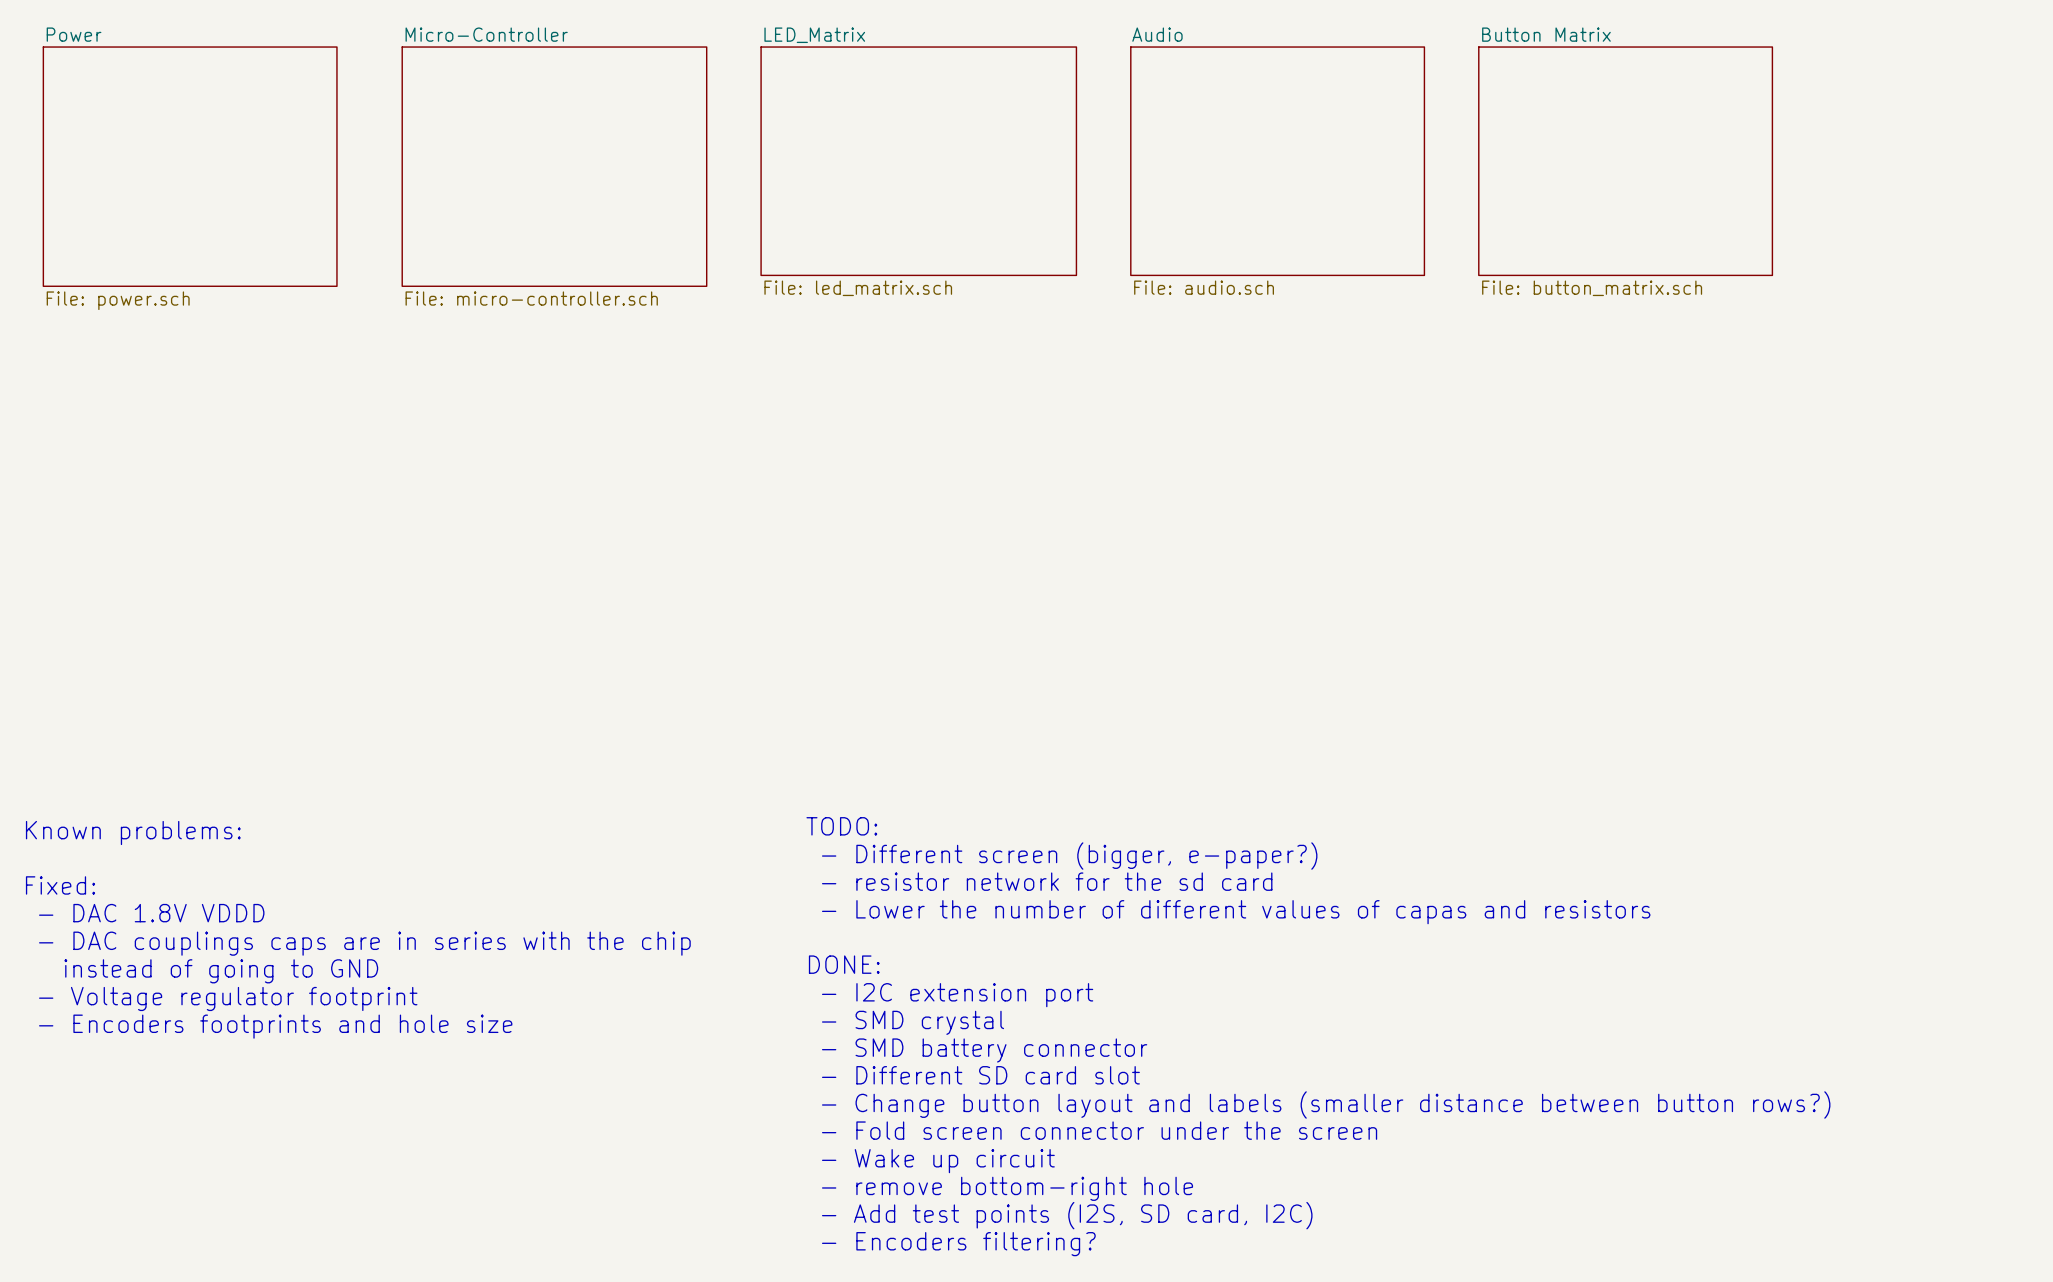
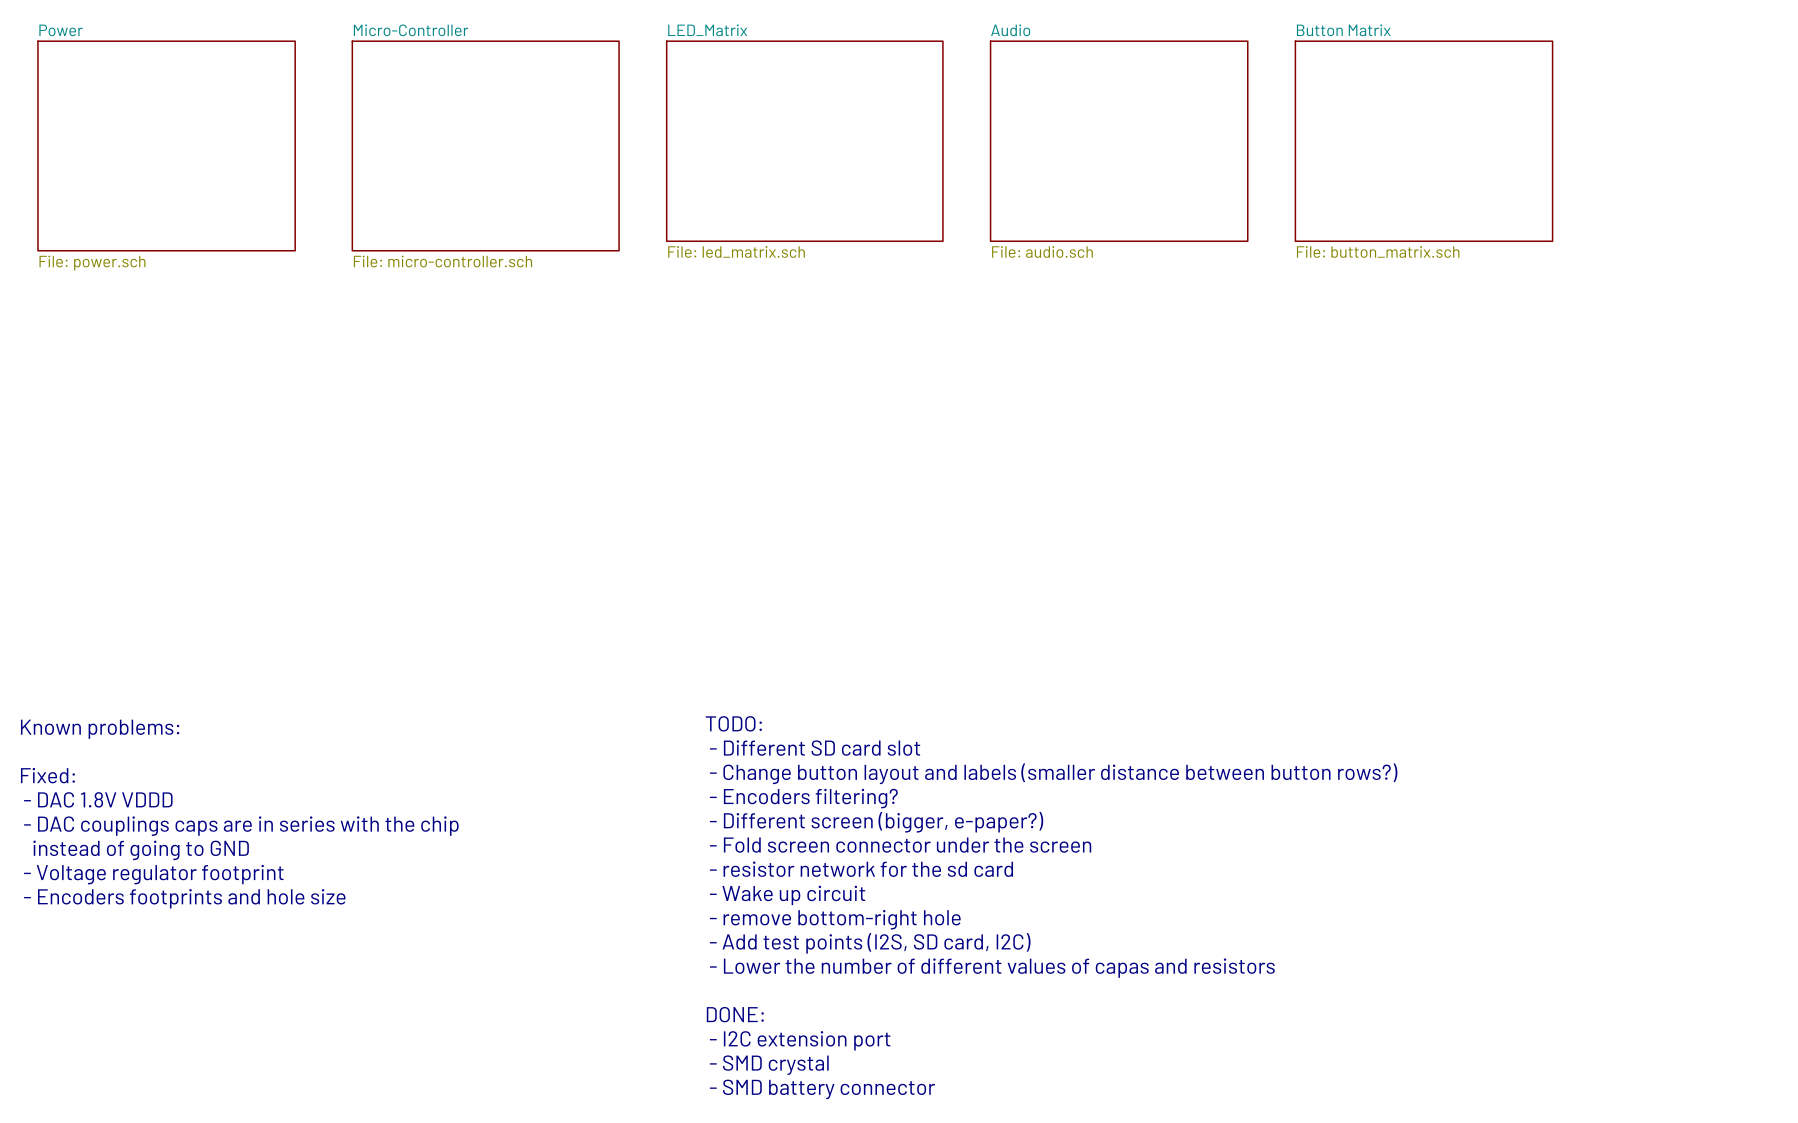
text: - Different screen (bigger, e-paper?) (1069, 856) -> - Different SD card slot (815, 748)
text: - resistor network for the sd card (1047, 881) -> - Change button layout and labels (smaller distance between button rows?) (1053, 773)
text: - Lower the number of different values of capas and resistors (1236, 912) -> - Encoders filtering? (803, 798)
text: none -> - Different screen (bigger, e-paper?) (876, 822)
text: DONE: (844, 964) -> - Fold screen connector under the screen (900, 845)
text: - I2C extension port (957, 995) -> - resistor network for the sd card (861, 869)
text: - SMD crystal (913, 1022) -> - Wake up circuit (787, 895)
text: - SMD battery connector (984, 1050) -> - remove bottom-right hole (835, 919)
text: - Different SD card slot (980, 1075) -> - Add test points (I2S, SD card, I2C) (870, 943)
text: - Change button layout and labels (smaller distance between button rows?) (1326, 1104) -> - Lower the number of different values of capas and resistors (992, 968)
text: - Fold screen connector under the screen (1099, 1130) -> none
text: - Wake up circuit (938, 1161) -> DONE: (735, 1014)
text: - remove bottom-right hole (1007, 1188) -> - I2C extension port (800, 1040)
text: - Add test points (I2S, SD card, I2C) (1067, 1215) -> - SMD crystal (769, 1065)
text: - Encoders filtering? (958, 1244) -> - SMD battery connector (822, 1089)

